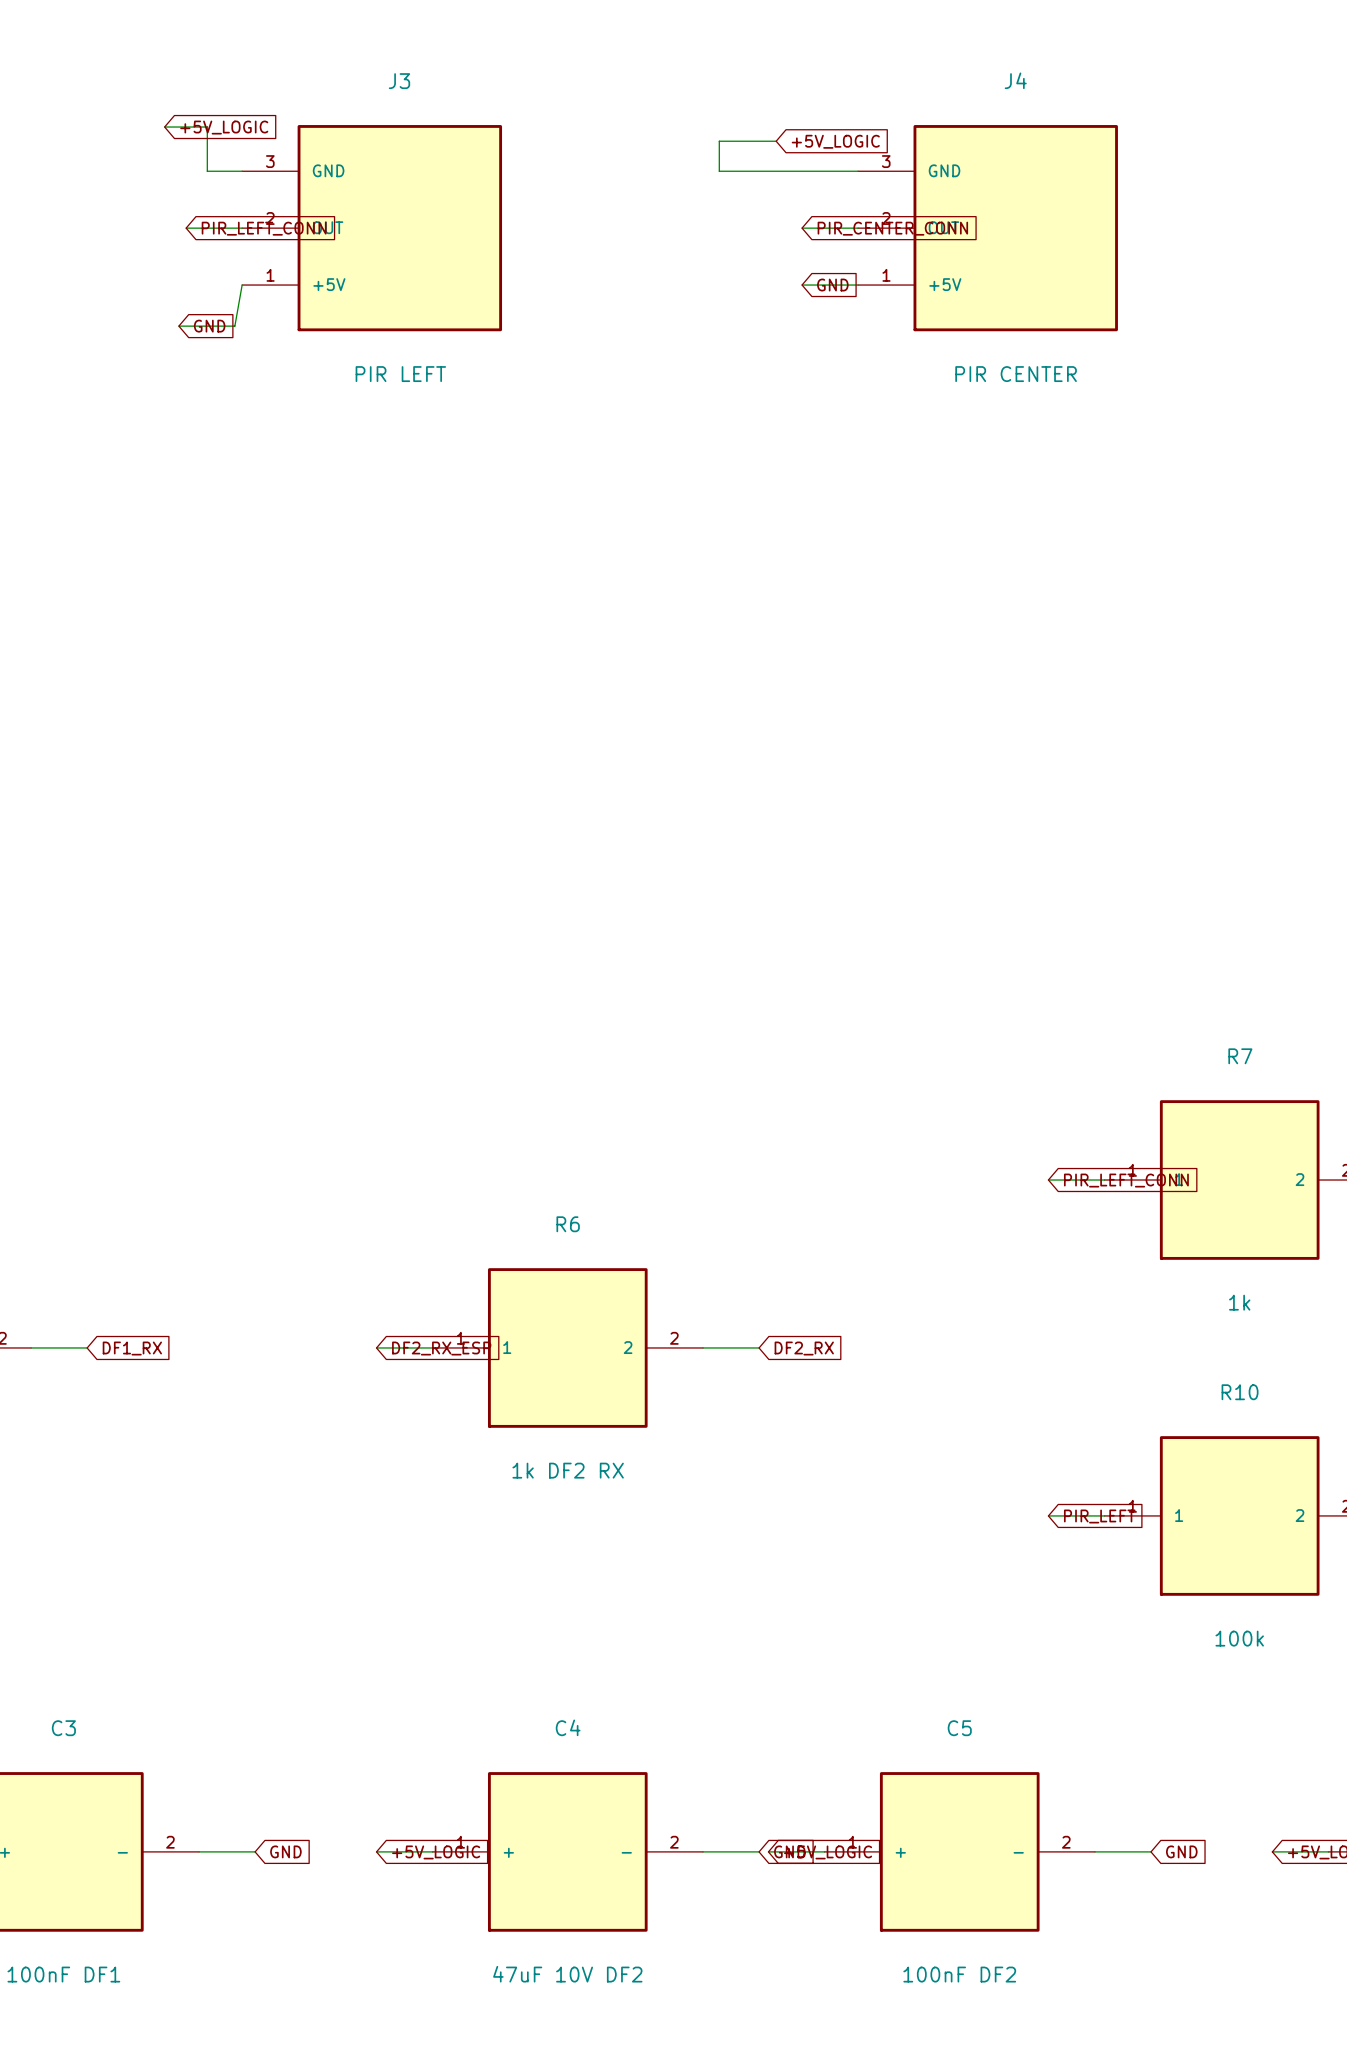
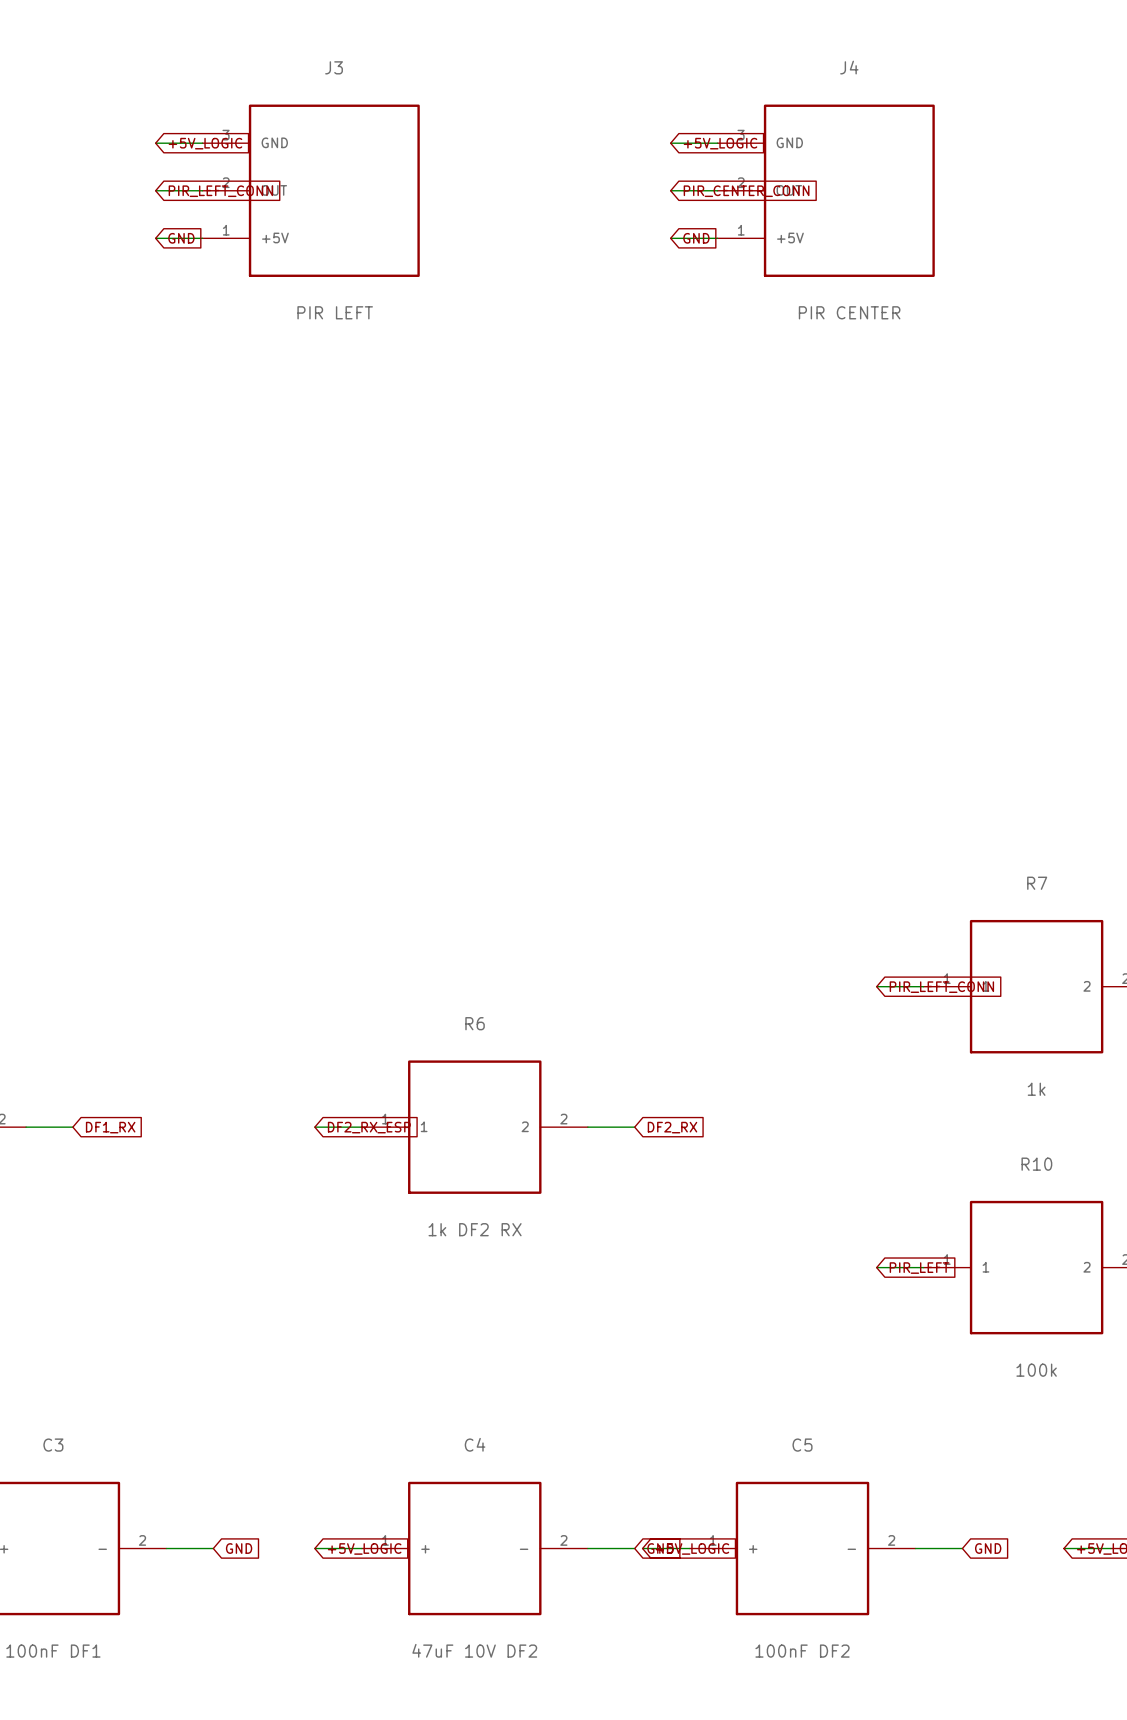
wire: (164, 127) (207, 127) (207, 171) -> (155, 143) (173, 143)
global label position: +5V_LOGIC (224, 127) -> +5V_LOGIC (205, 143)
wire: (776, 141) (719, 141) (719, 171) (802, 171) -> none
global label position: +5V_LOGIC (835, 141) -> +5V_LOGIC (720, 143)
wire: (242, 285) (234, 326) (178, 326) -> (202, 238) (155, 238)
global label position: GND (209, 326) -> GND (181, 238)

